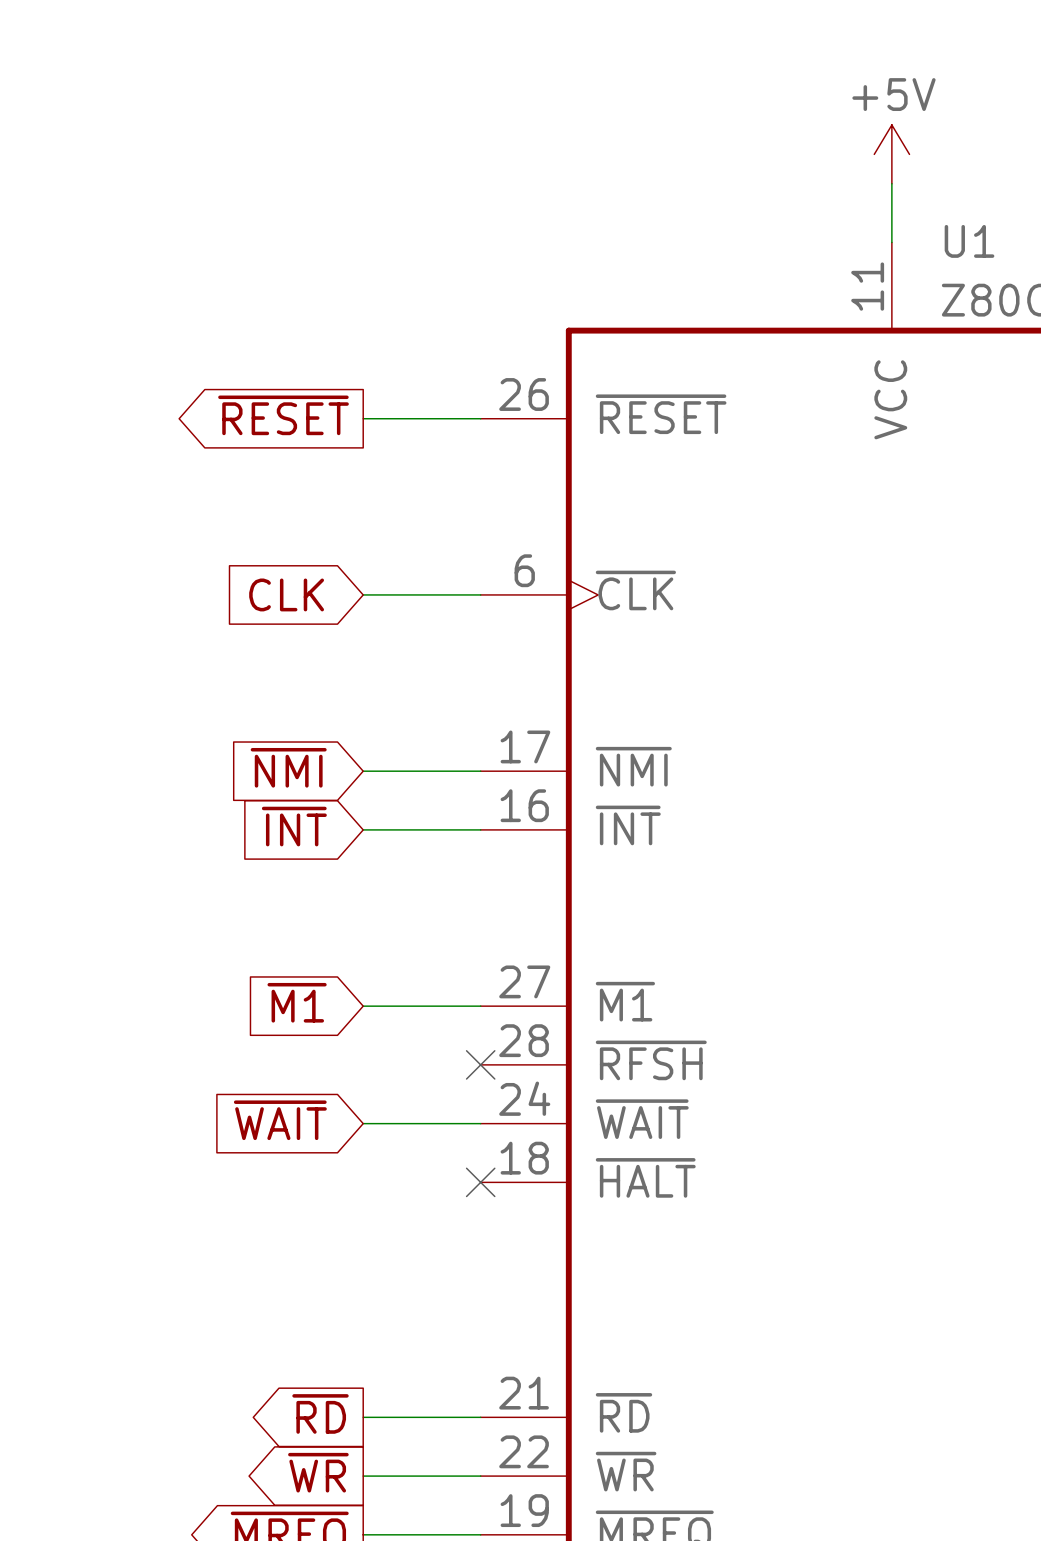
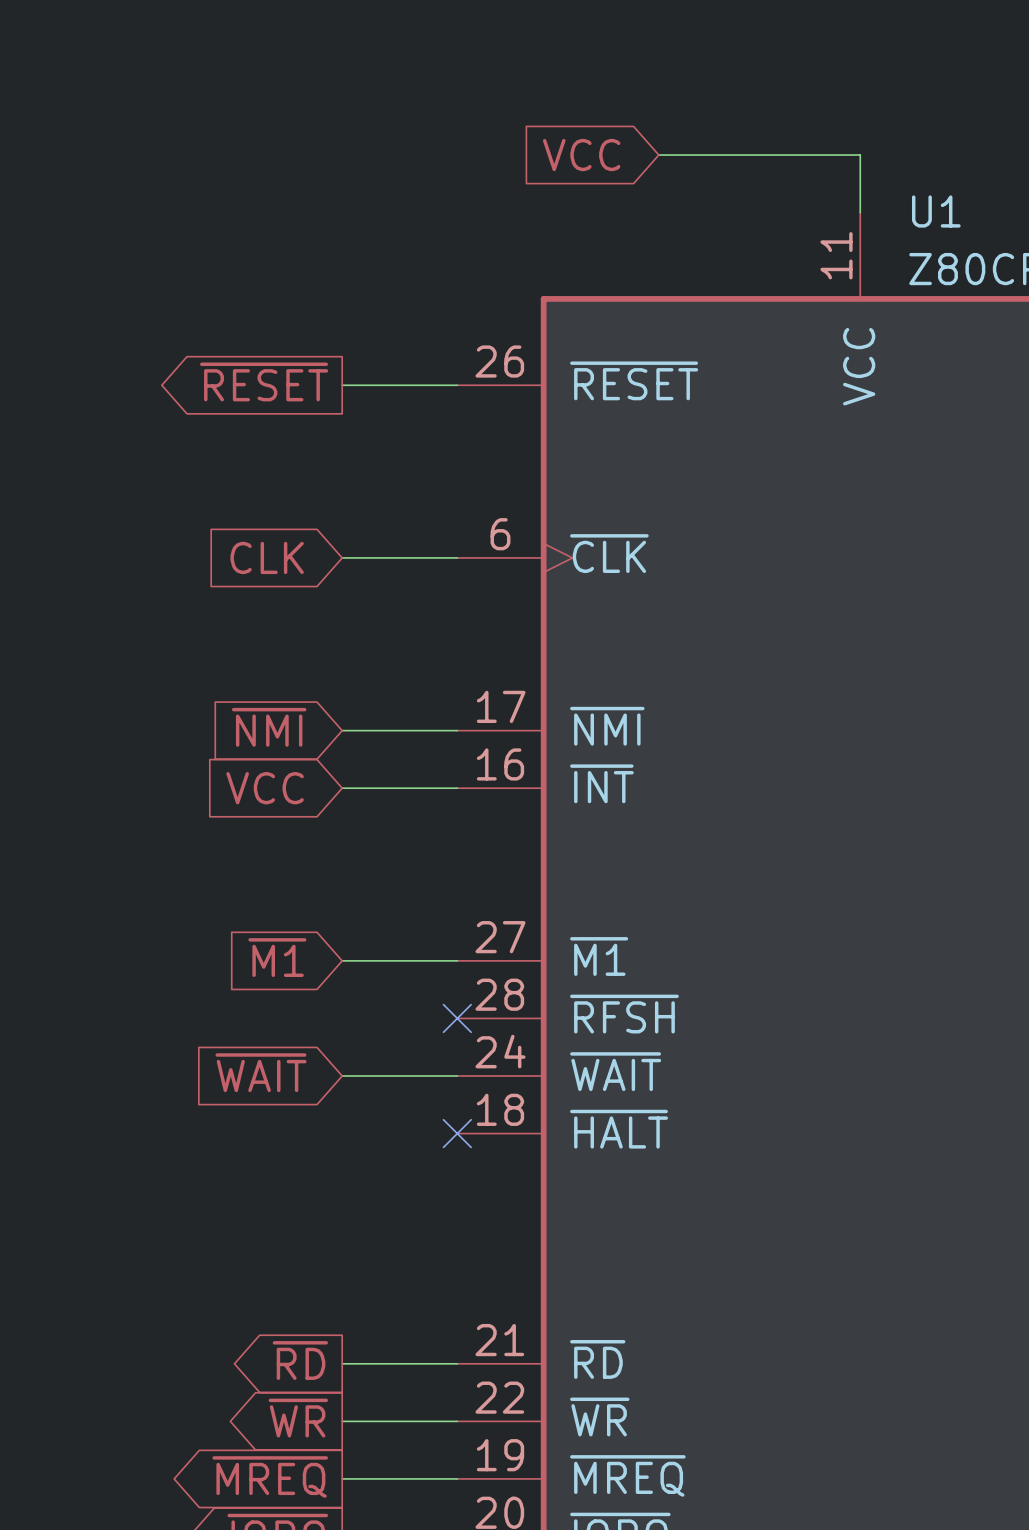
power symbol: +5V (891, 154) -> none
global label: none -> VCC (581, 155)
wire: none -> (658, 155) (860, 155)
global label: ~{INT} (294, 826) -> VCC (265, 788)

